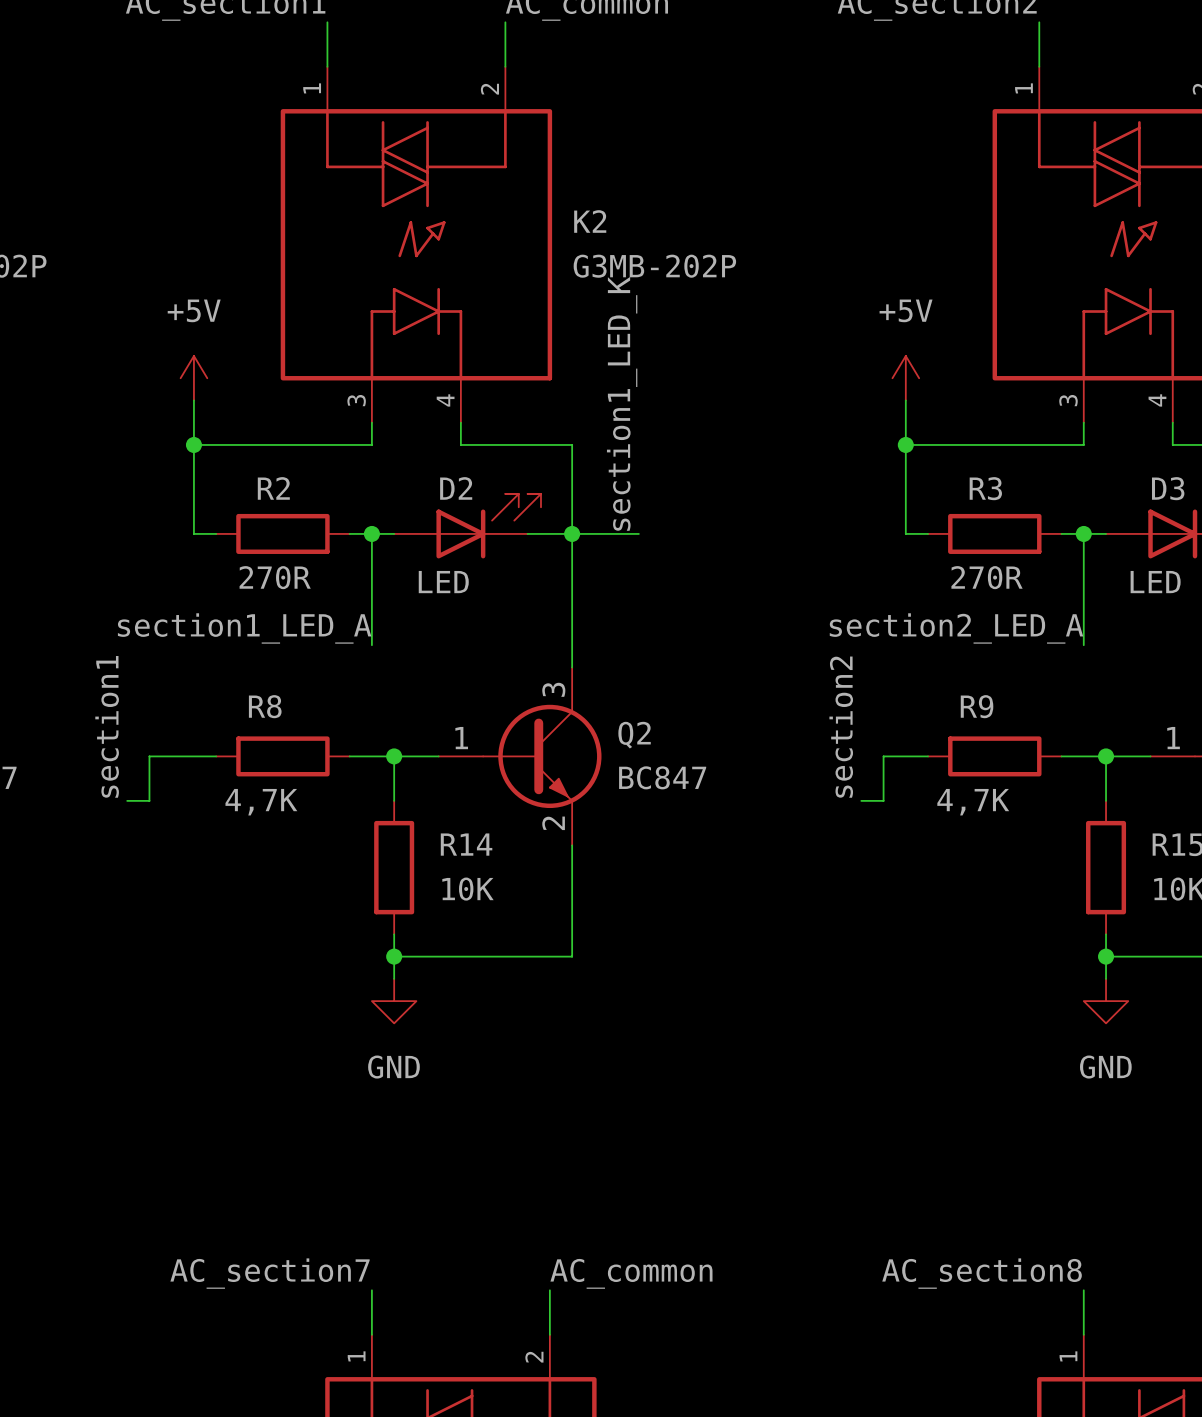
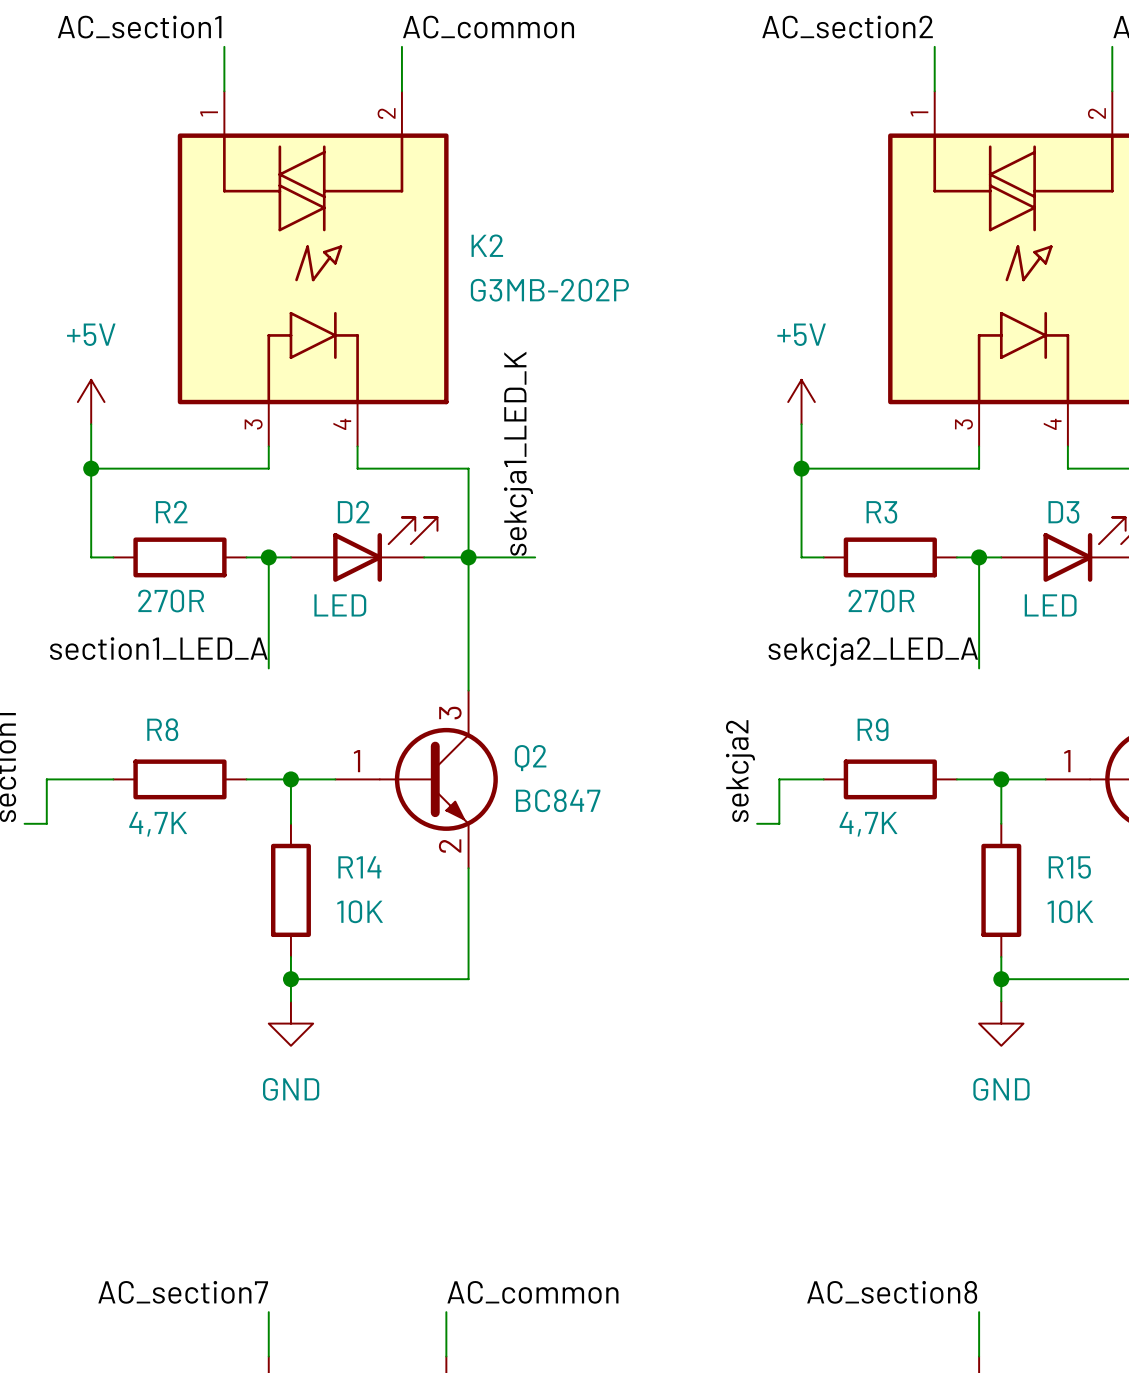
label: section1_LED_K (622, 403) -> sekcja1_LED_K (518, 453)
label: section2_LED_A (956, 628) -> sekcja2_LED_A (873, 651)
label: section2 (841, 727) -> sekcja2 (740, 771)

